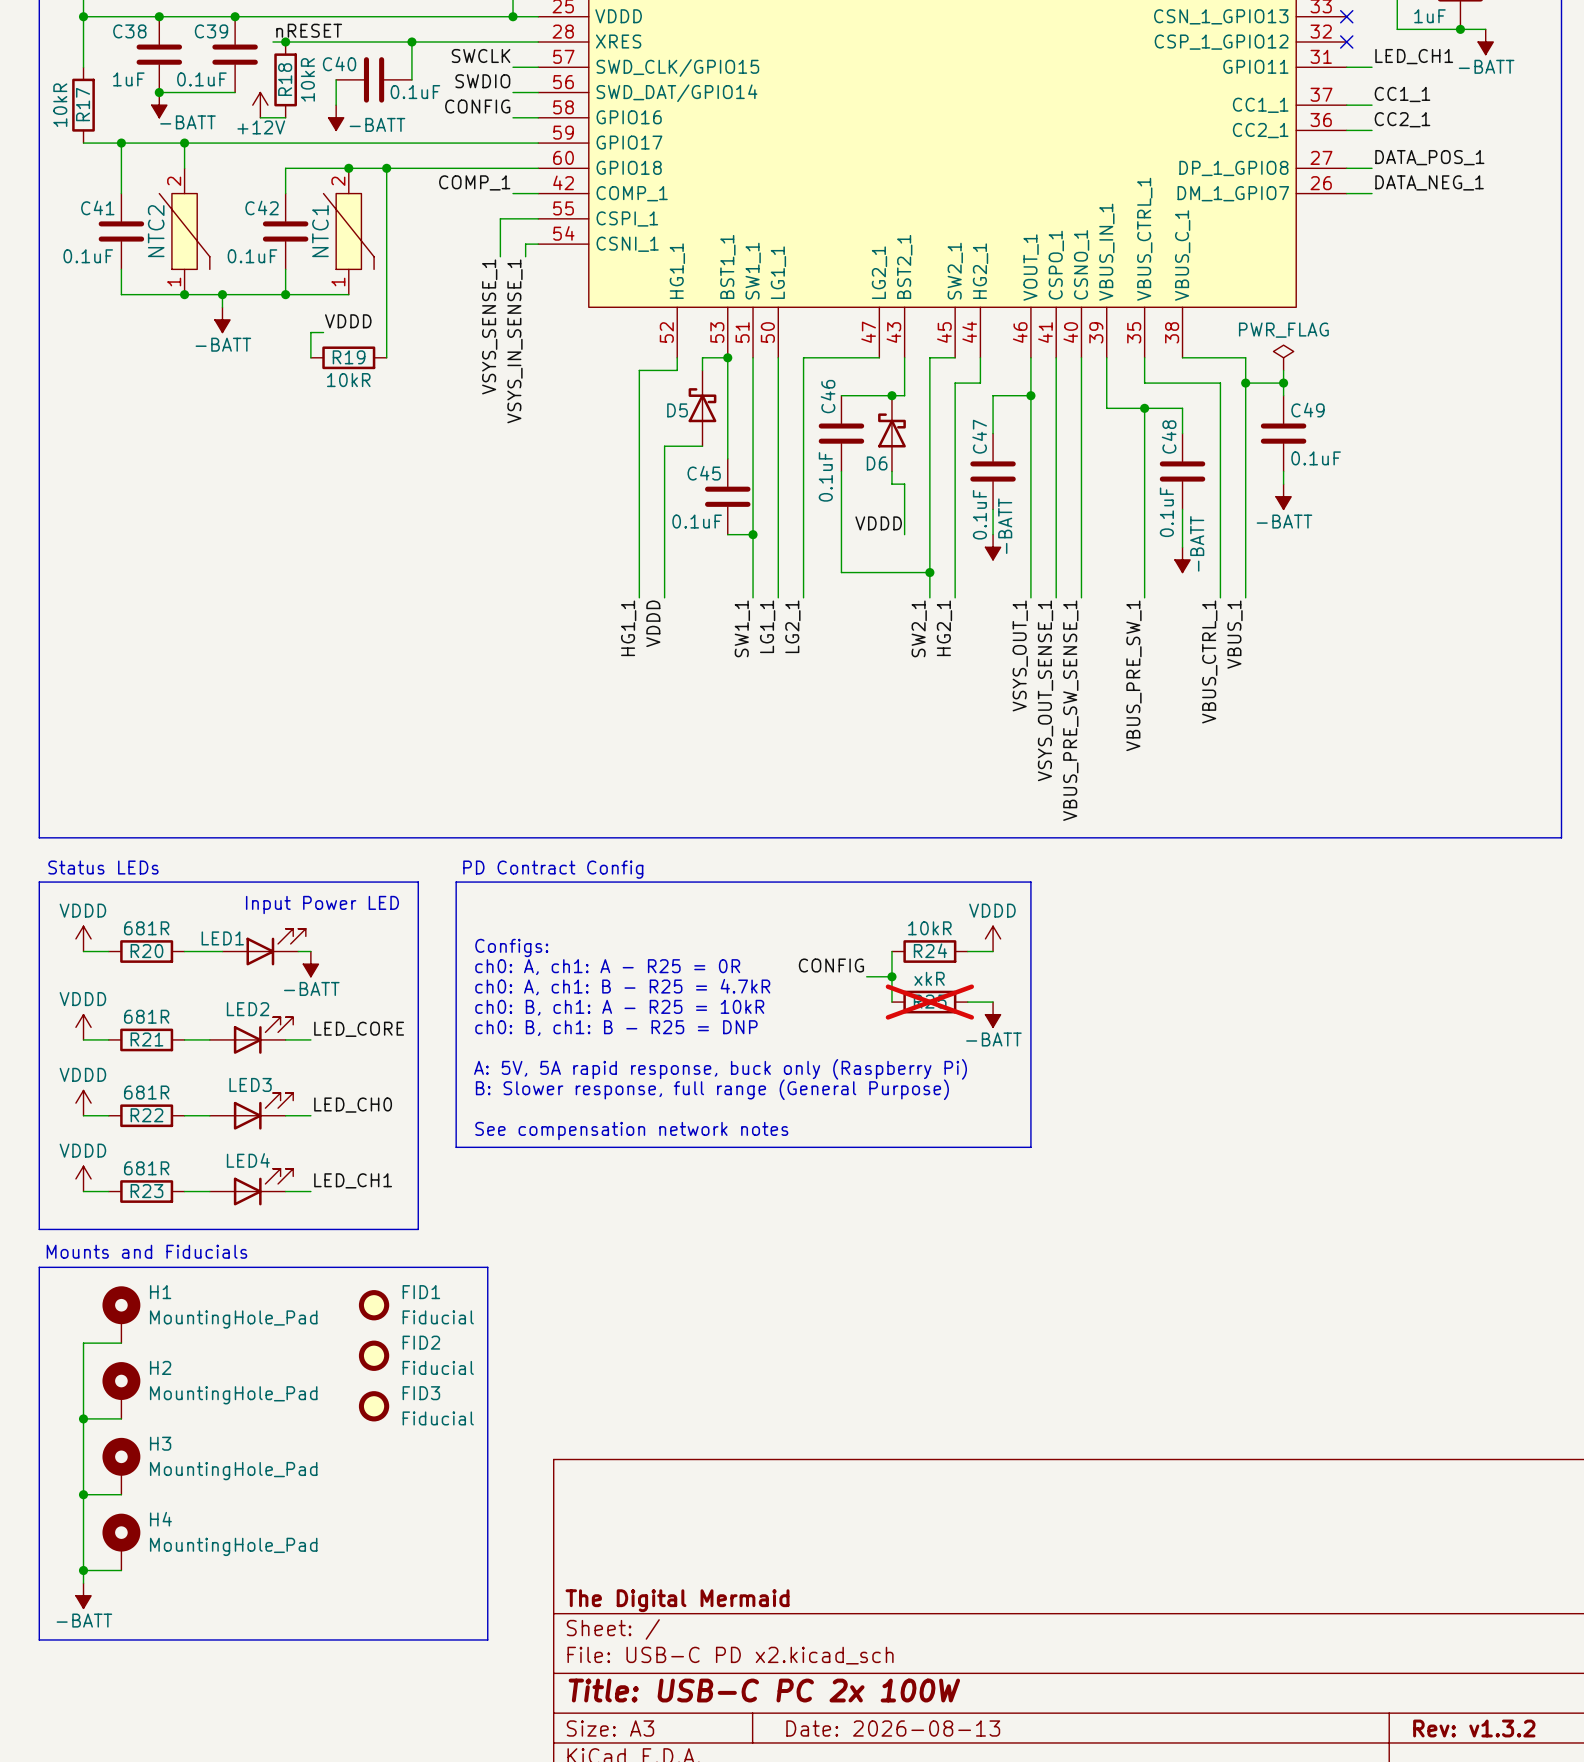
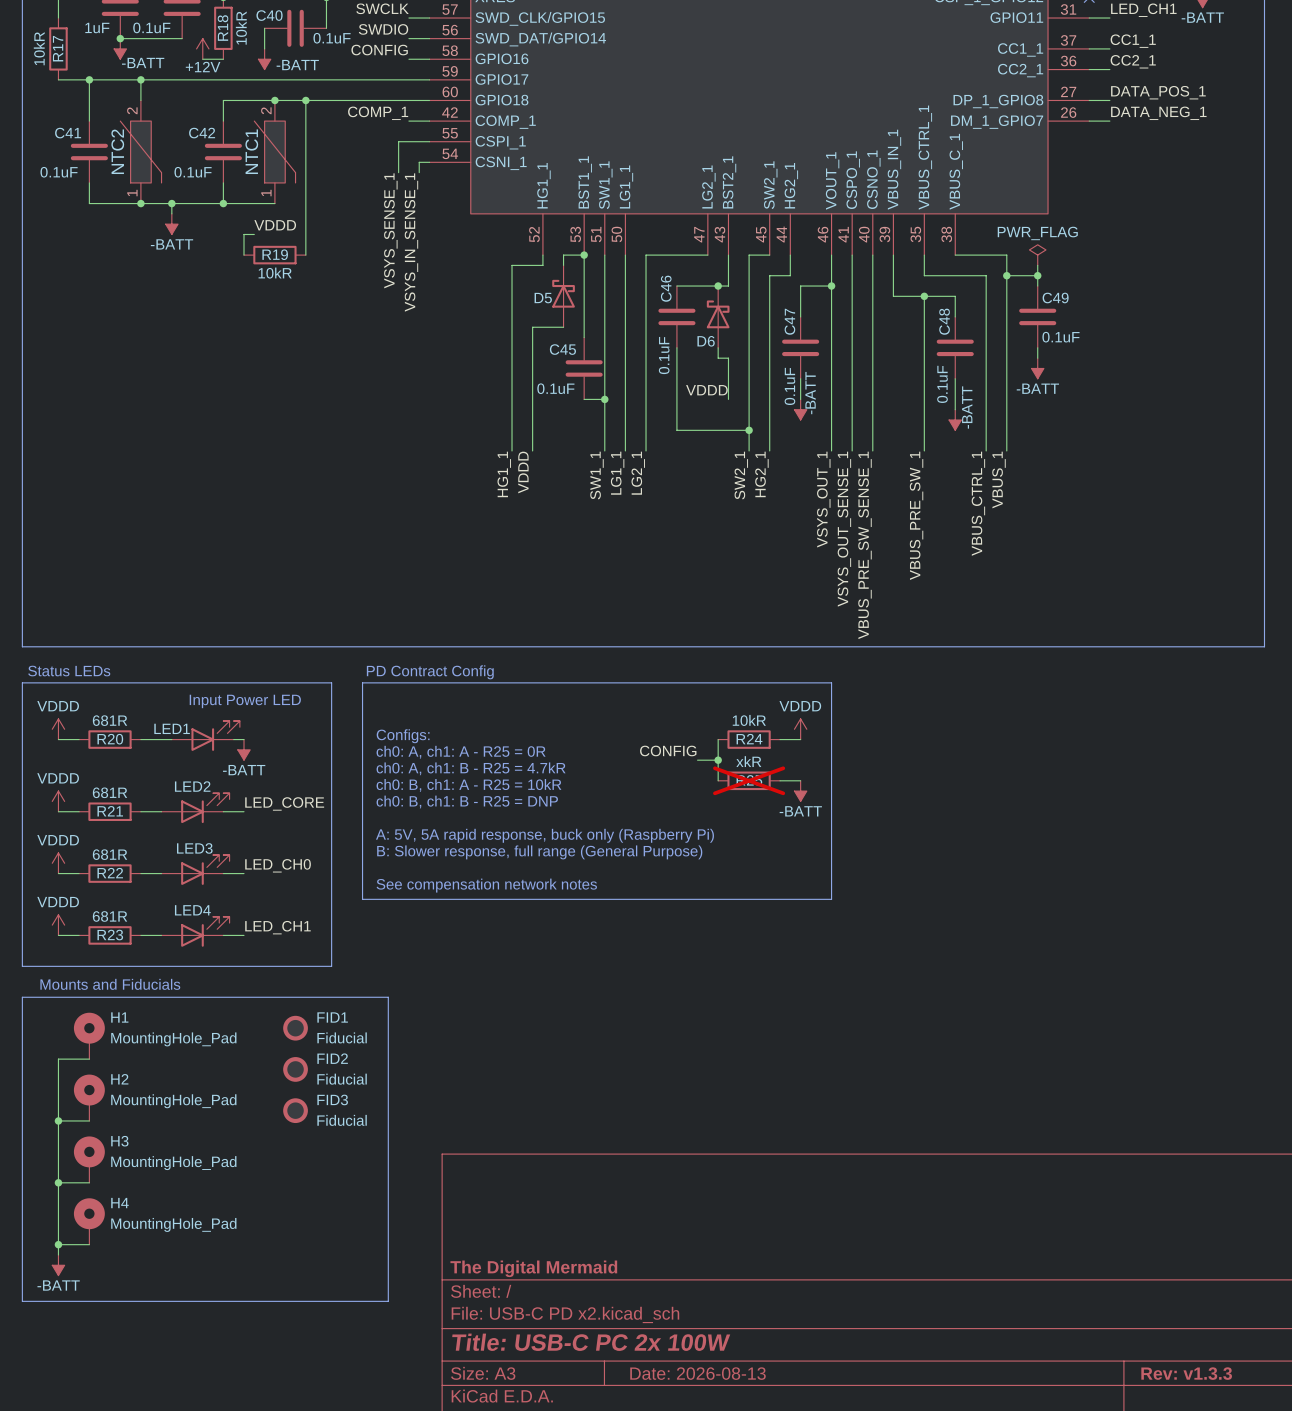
title block: Rev: v1.3.2 (1474, 1728) -> Rev: v1.3.3 (1186, 1373)

